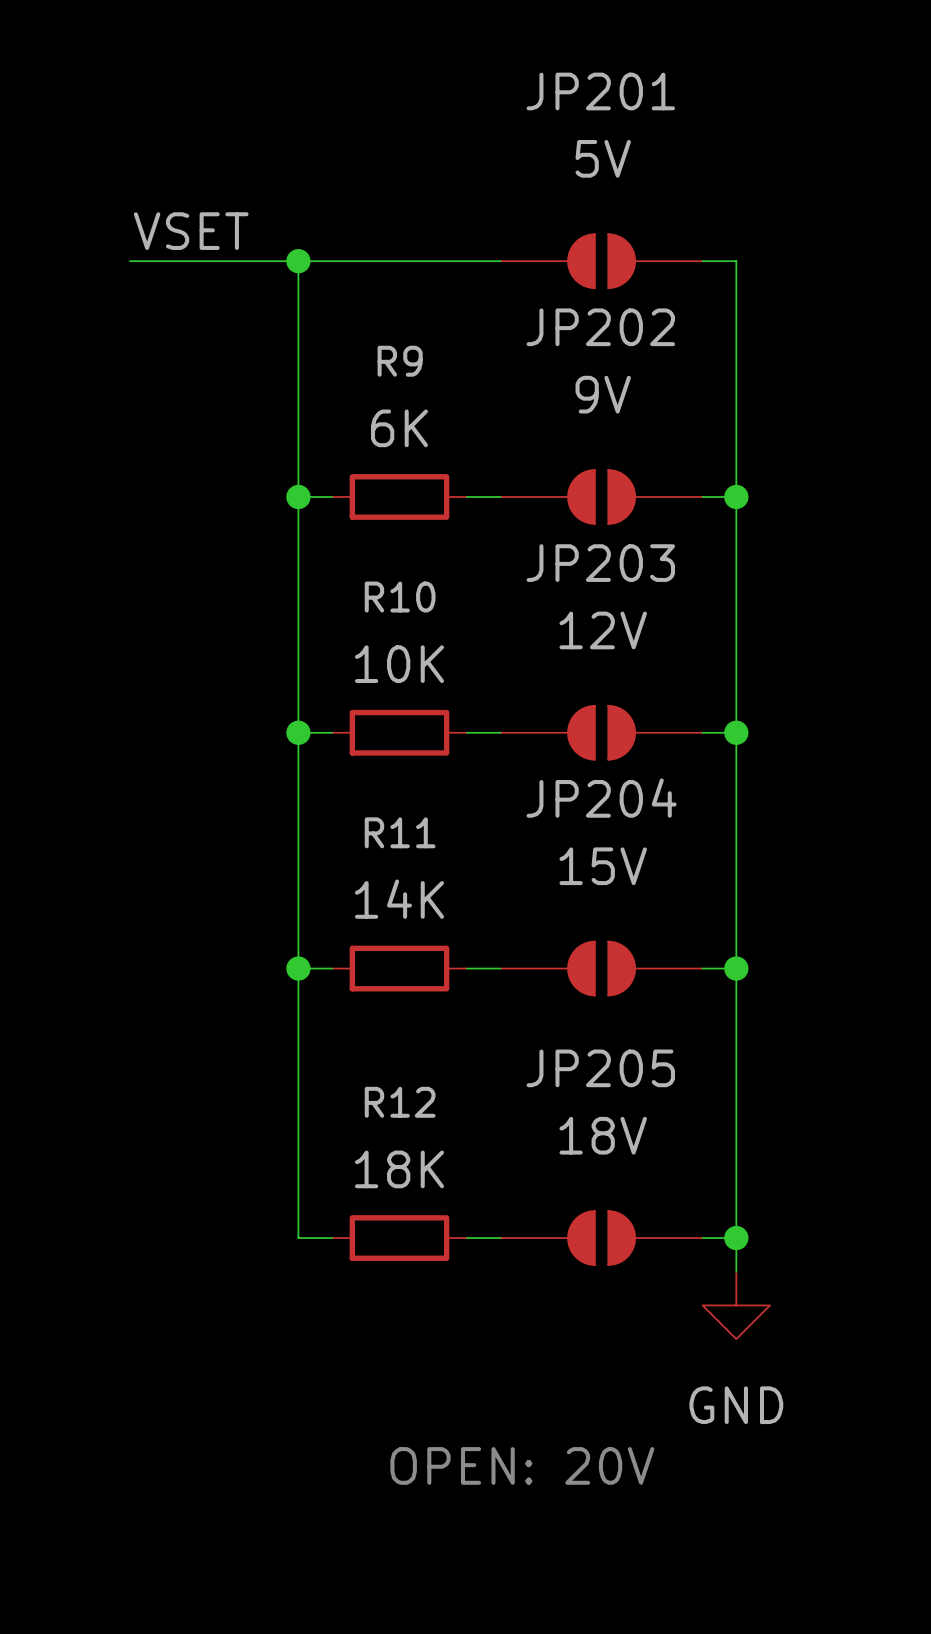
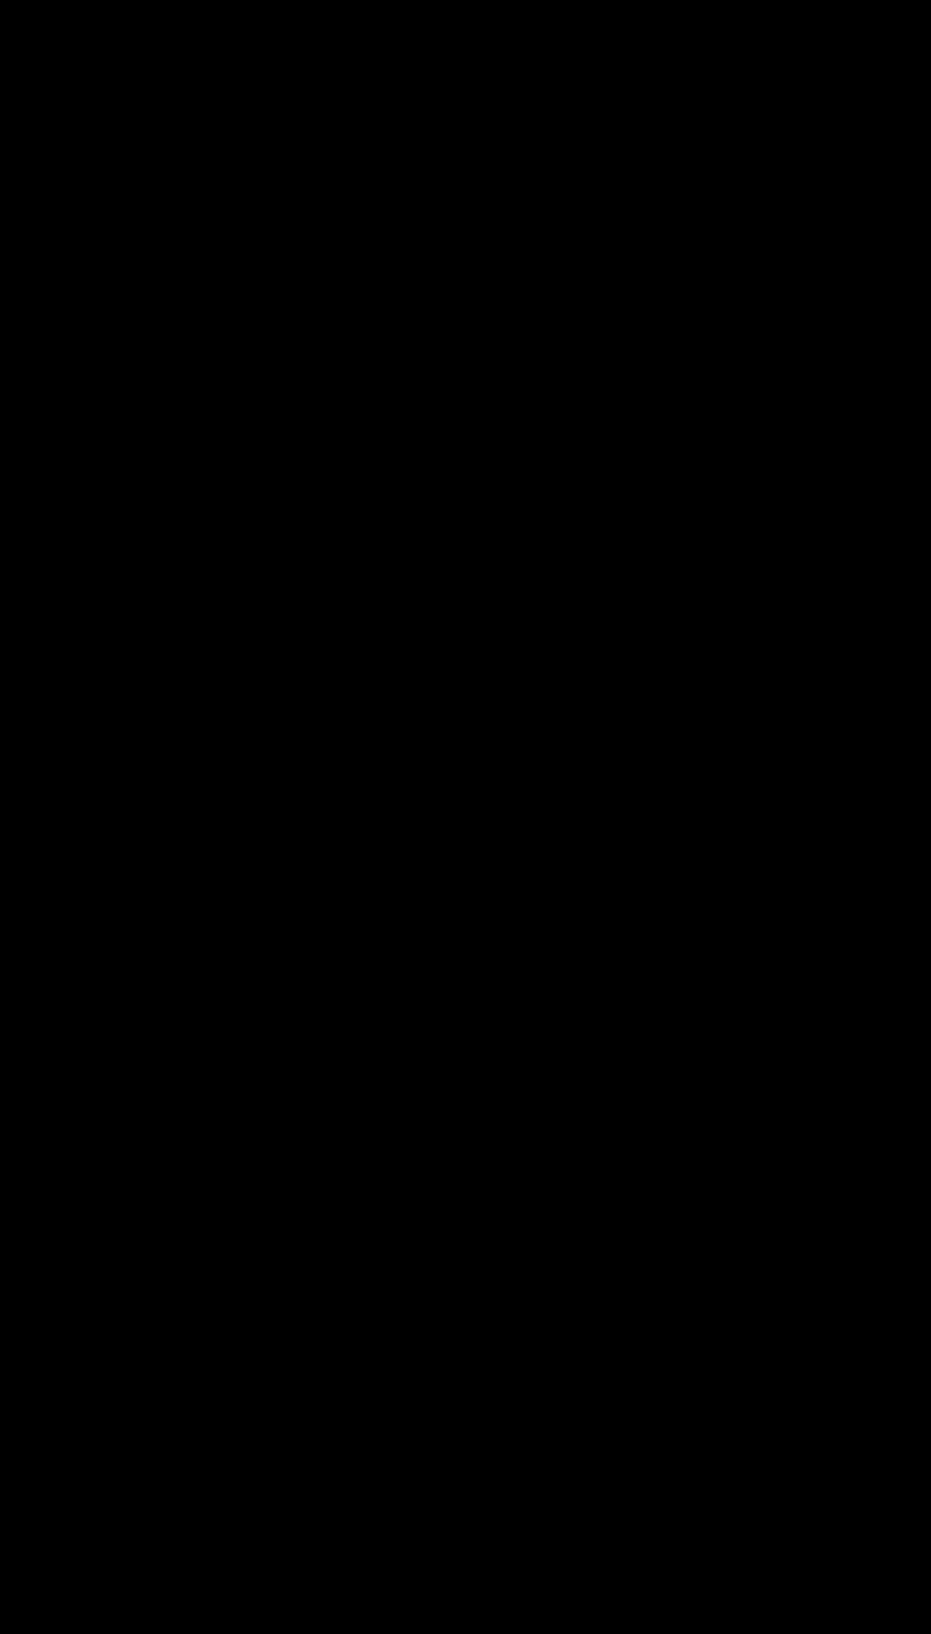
label: VSET (191, 231) -> none
wire: (130, 261) (500, 261) -> none
wire: (298, 261) (298, 1238) (332, 1238) -> none
junction: (298, 261) -> none
JP201: 5V (601, 261) -> none
wire: (702, 261) (736, 261) (736, 1271) -> none
wire: (298, 496) (332, 496) -> none
junction: (298, 496) -> none
R9: 6K (399, 496) -> none
wire: (466, 496) (500, 496) -> none
JP202: 9V (601, 496) -> none
wire: (702, 496) (736, 496) -> none
junction: (736, 496) -> none
wire: (298, 732) (332, 732) -> none
junction: (298, 732) -> none
R10: 10K (399, 732) -> none
wire: (466, 732) (500, 732) -> none
JP203: 12V (601, 732) -> none
wire: (702, 732) (736, 732) -> none
junction: (736, 732) -> none
wire: (298, 968) (332, 968) -> none
junction: (298, 968) -> none
R11: 14K (399, 968) -> none
wire: (466, 968) (500, 968) -> none
JP204: 15V (601, 968) -> none
wire: (702, 968) (736, 968) -> none
junction: (736, 968) -> none
R12: 18K (399, 1238) -> none
wire: (466, 1238) (500, 1238) -> none
JP205: 18V (601, 1238) -> none
wire: (702, 1238) (736, 1238) -> none
junction: (736, 1238) -> none
power symbol: GND (736, 1305) -> none
text: OPEN: 20V (522, 1465) -> none

